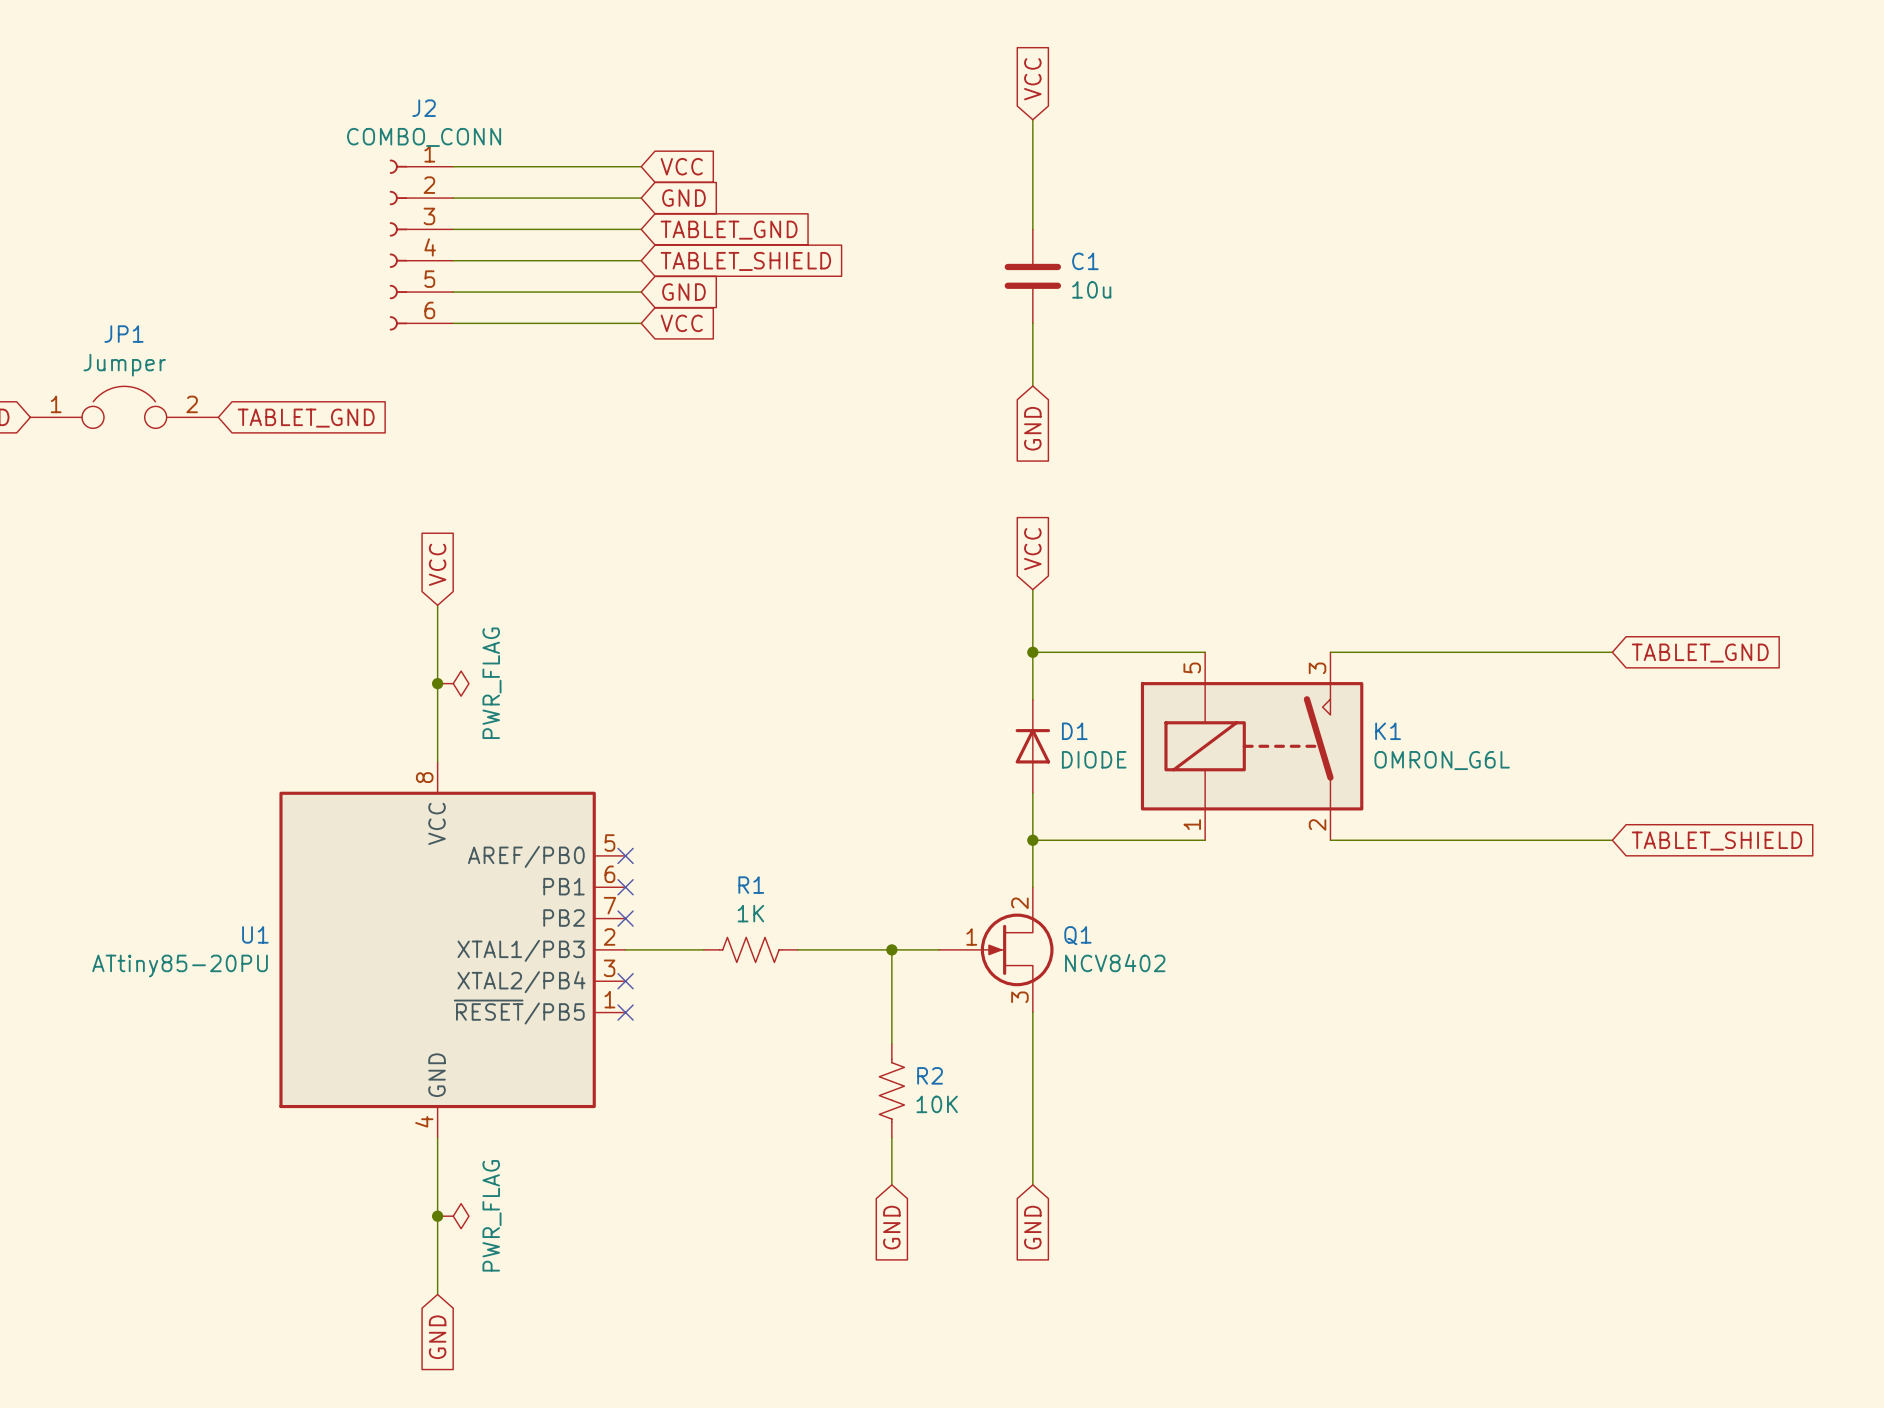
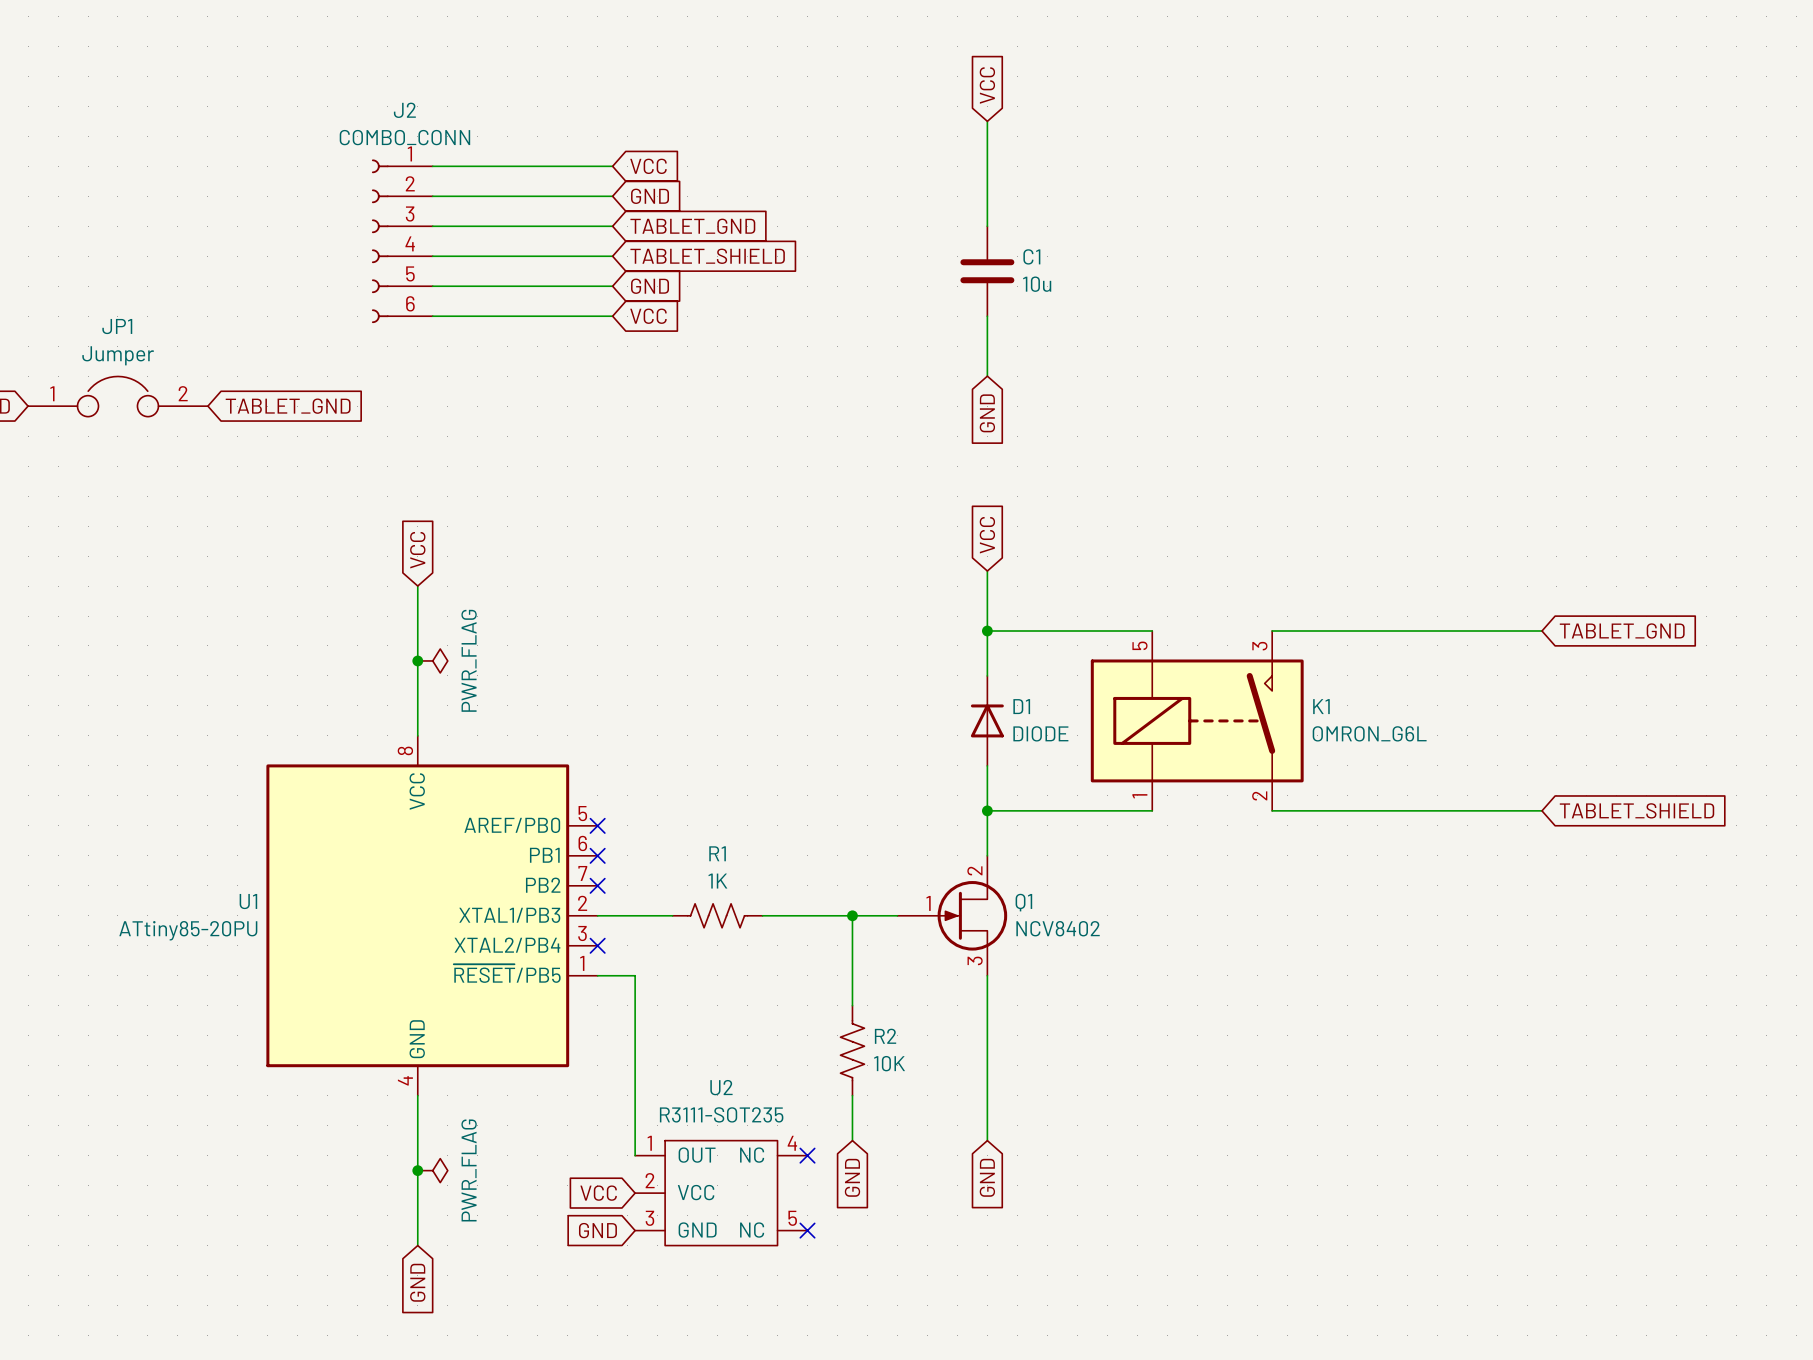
wire: none -> (597, 975) (635, 975) (635, 1155)
no-connect mark: (625, 1012) -> none
no-connect mark: none -> (807, 1155)
global label: none -> VCC (598, 1193)
U2: none -> R3111-SOT235 (721, 1193)
global label: none -> GND (597, 1230)
no-connect mark: none -> (807, 1230)

